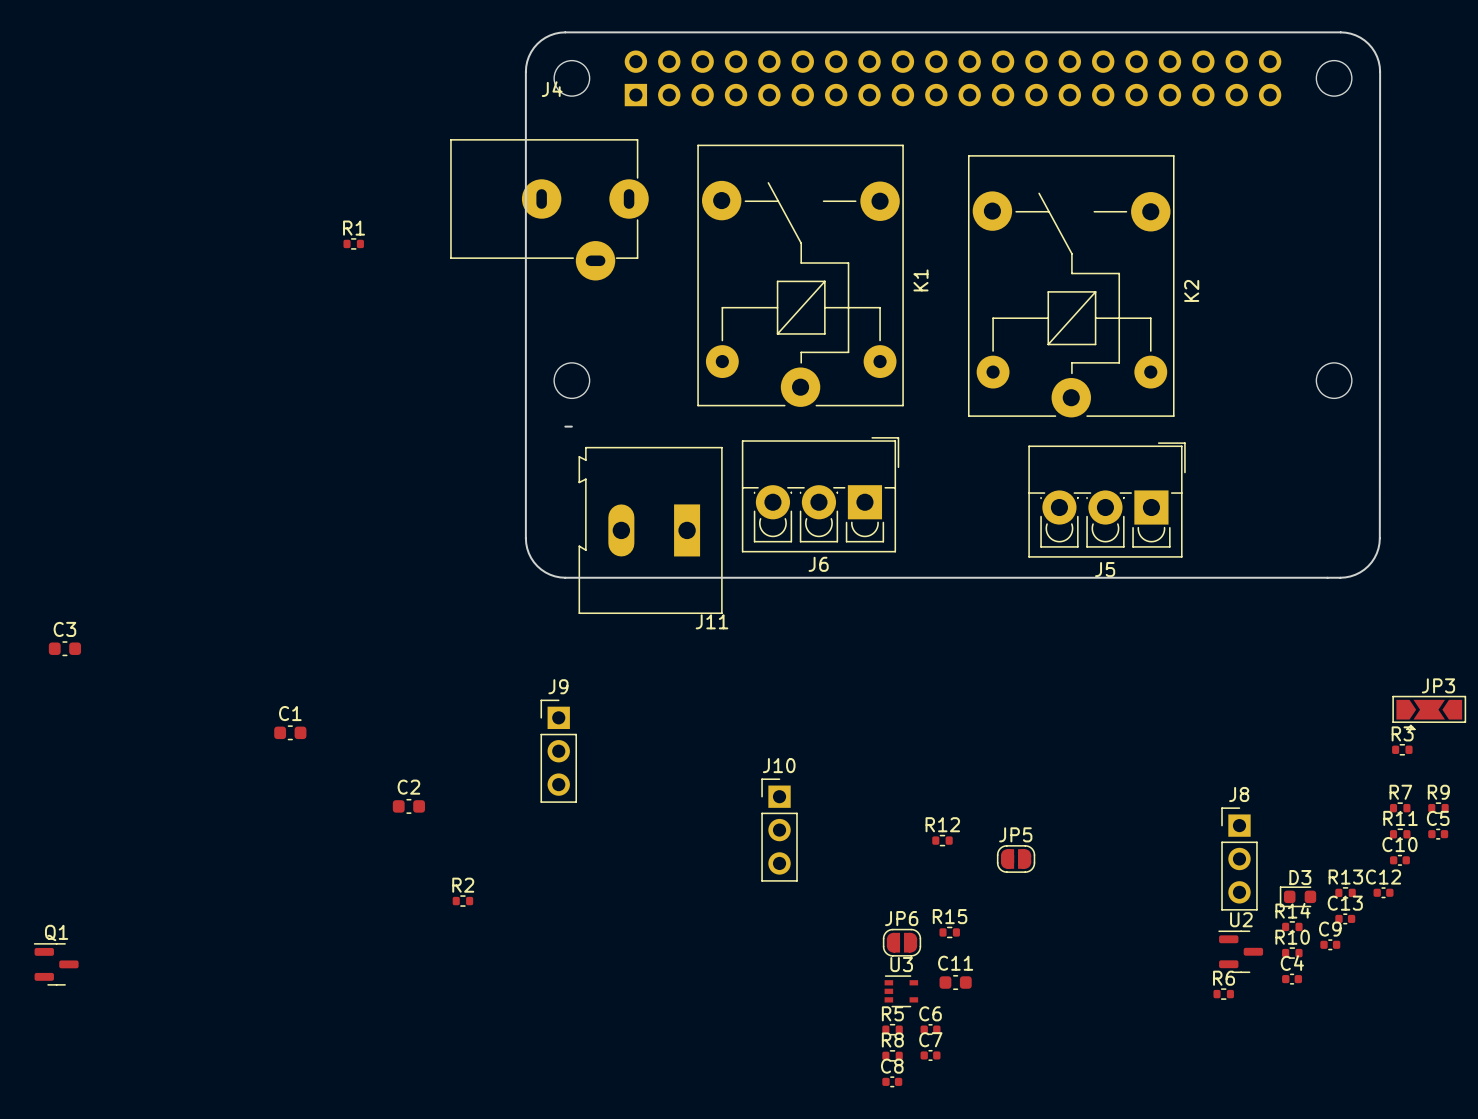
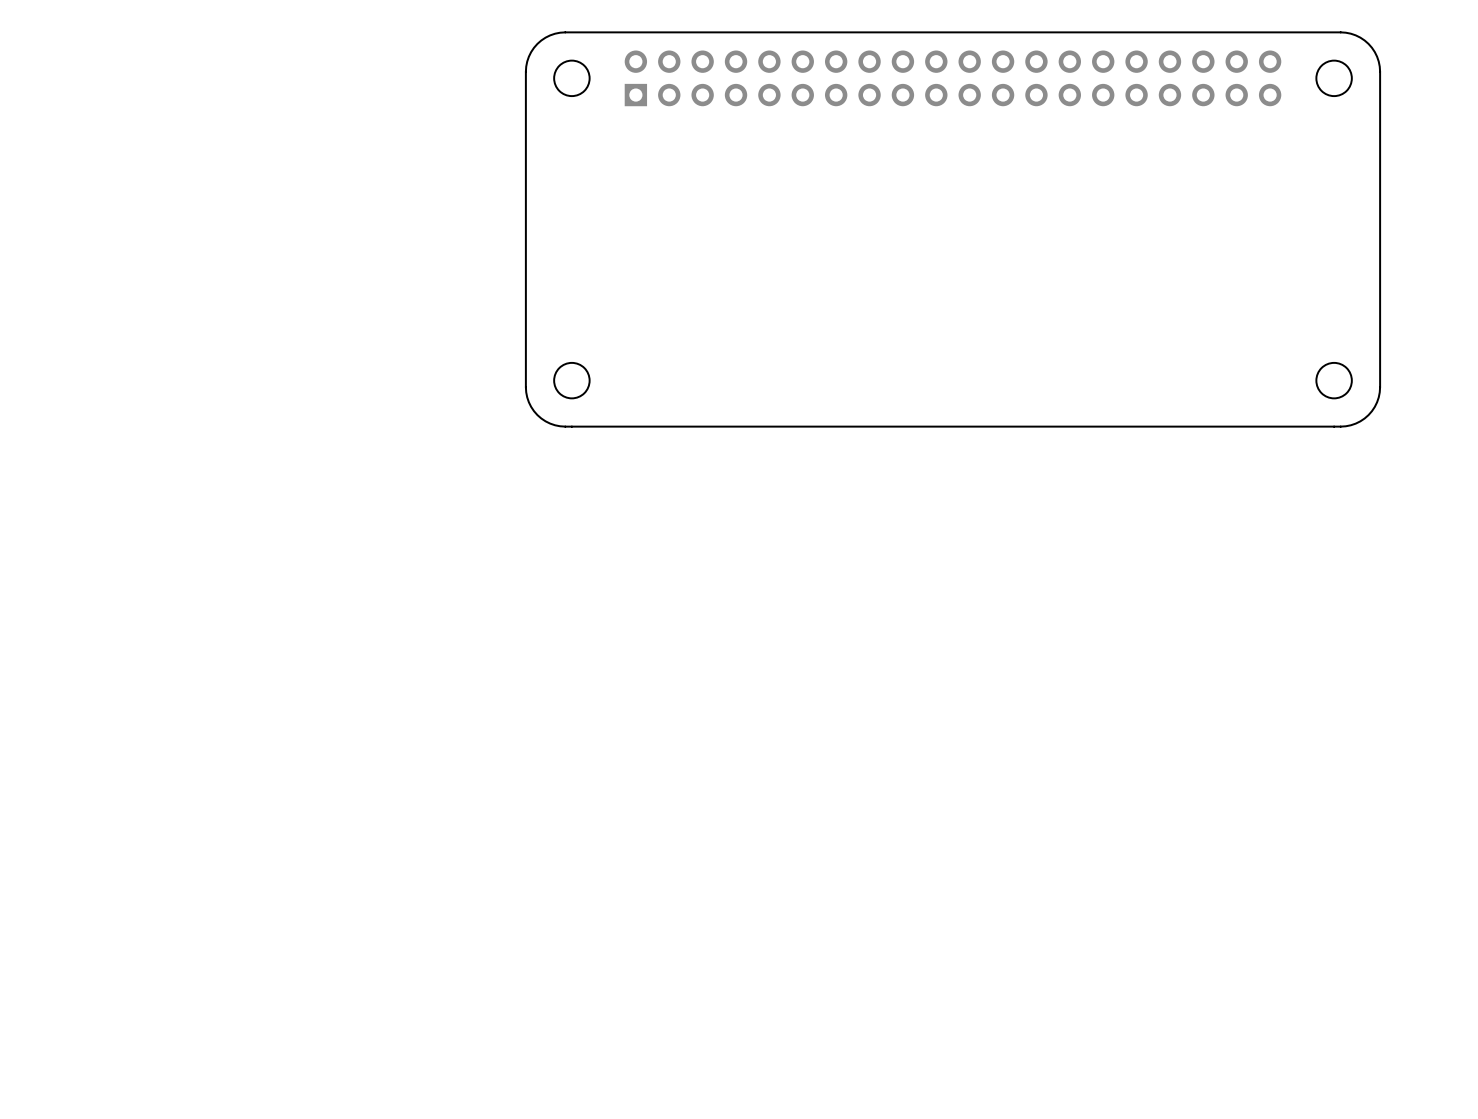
board edge: (1380, 71) (1379, 538) (1374, 558) (1368, 566) (1355, 574) (1340, 577) (555, 576) (537, 566) (528, 553) (526, 543) (525, 387) -> (1380, 71) (1379, 392) (1371, 411) (1355, 423) (1340, 426) (571, 426)
J4: (549, 209) -> none
R1: (353, 243) -> none
K1: (800, 275) -> none
K2: (1071, 286) -> none
board edge: none -> (525, 387) (528, 402) (537, 415) (550, 423) (565, 426)
J6: (820, 494) -> none
J5: (1107, 500) -> none
J11: (650, 530) -> none
C3: (64, 648) -> none
JP3: (1429, 712) -> none
C1: (290, 732) -> none
R3: (1402, 749) -> none
J9: (558, 751) -> none
C2: (408, 806) -> none
R7: (1400, 808) -> none
R9: (1438, 808) -> none
J10: (779, 830) -> none
R11: (1400, 834) -> none
C5: (1438, 834) -> none
R12: (942, 840) -> none
JP5: (1016, 858) -> none
J8: (1239, 858) -> none
C10: (1399, 860) -> none
R13: (1345, 892) -> none
C12: (1383, 892) -> none
D3: (1297, 896) -> none
R2: (462, 901) -> none
C13: (1345, 918) -> none
R14: (1292, 926) -> none
R15: (949, 932) -> none
JP6: (902, 942) -> none
C9: (1330, 944) -> none
U2: (1240, 951) -> none
R10: (1292, 953) -> none
Q1: (56, 964) -> none
C4: (1292, 979) -> none
C11: (955, 982) -> none
U3: (901, 991) -> none
R6: (1223, 994) -> none
R5: (892, 1029) -> none
C6: (930, 1029) -> none
R8: (892, 1055) -> none
C7: (930, 1055) -> none
C8: (892, 1081) -> none

